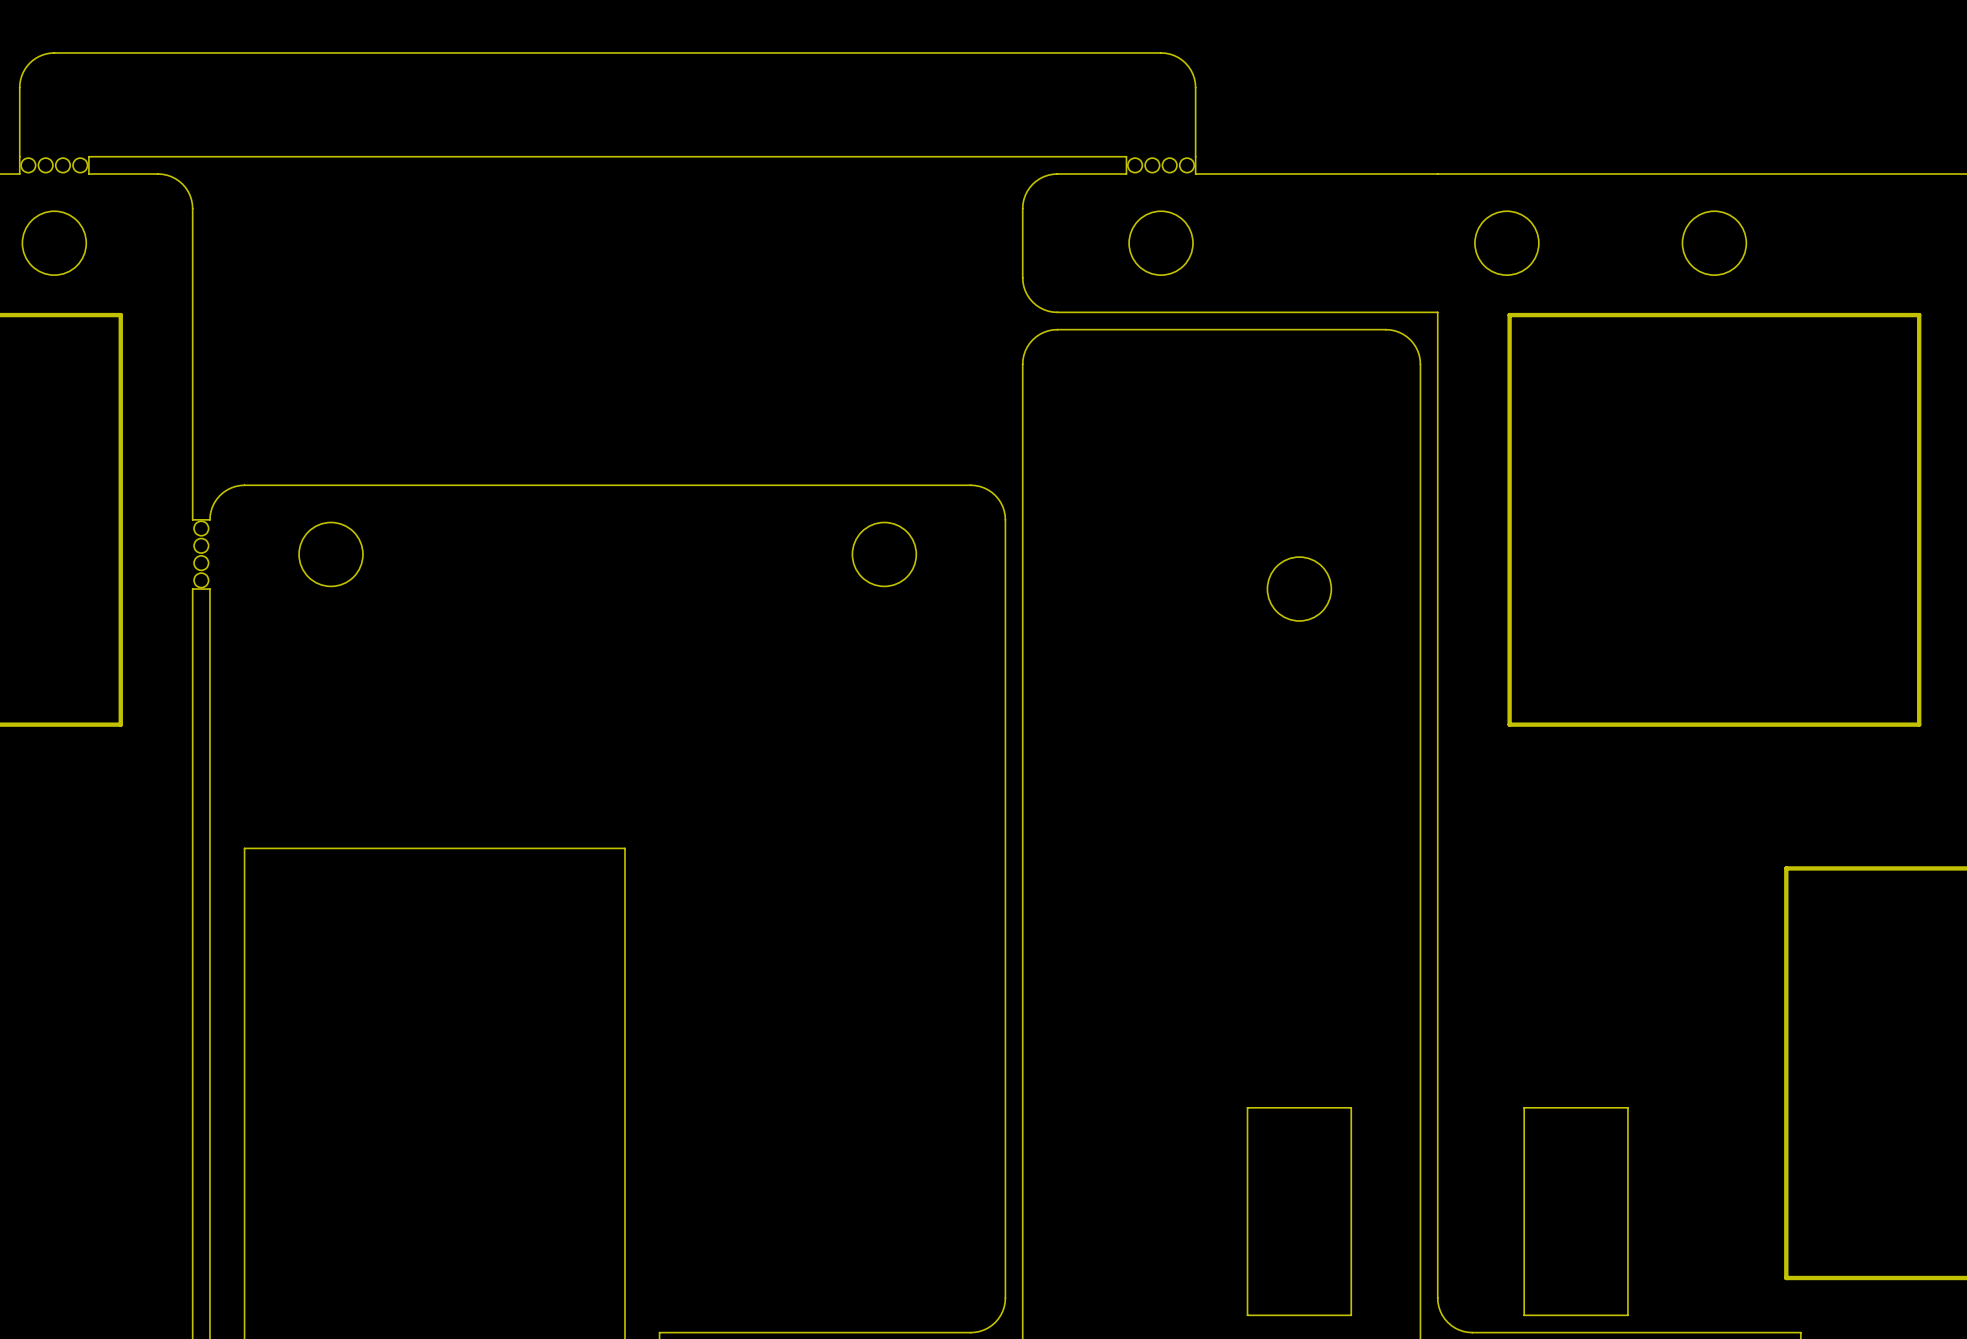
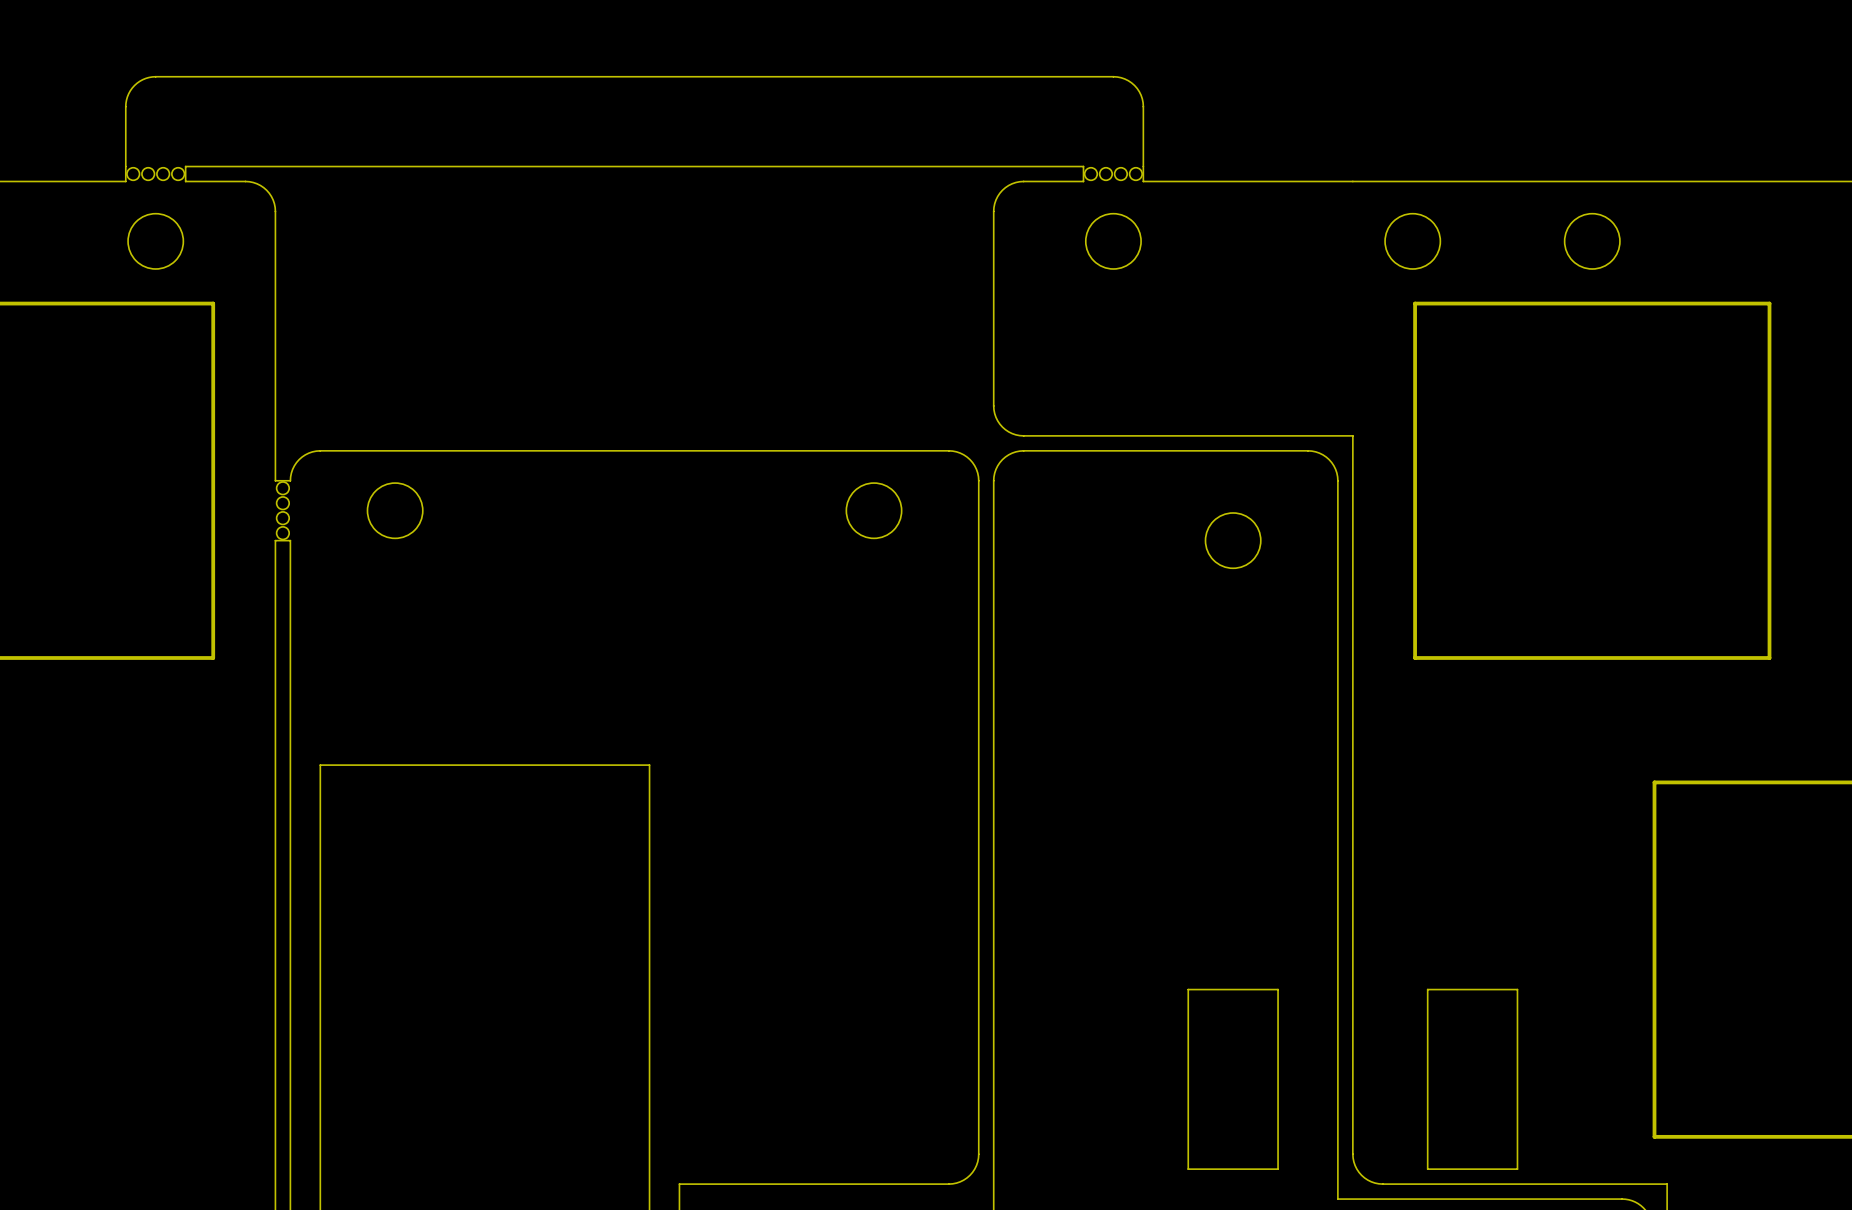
board edge: (1022, 208) (1023, 286) (1032, 302) (1048, 311) (1437, 312) (1437, 467) -> (993, 405) (995, 417) (1002, 427) (1012, 433) (1019, 435) (1352, 435)
board edge: none -> (993, 211) (993, 346)
board edge: (1022, 364) (1023, 355) (1029, 343) (1040, 334) (1052, 329) (1385, 329) (1399, 332) (1413, 343) (1420, 359) (1420, 519) -> (993, 480) (995, 469) (1002, 459) (1012, 453) (1023, 450) (1311, 451) (1319, 453) (1329, 459) (1335, 469) (1337, 480)
board edge: (1022, 433) (1022, 519) -> none

